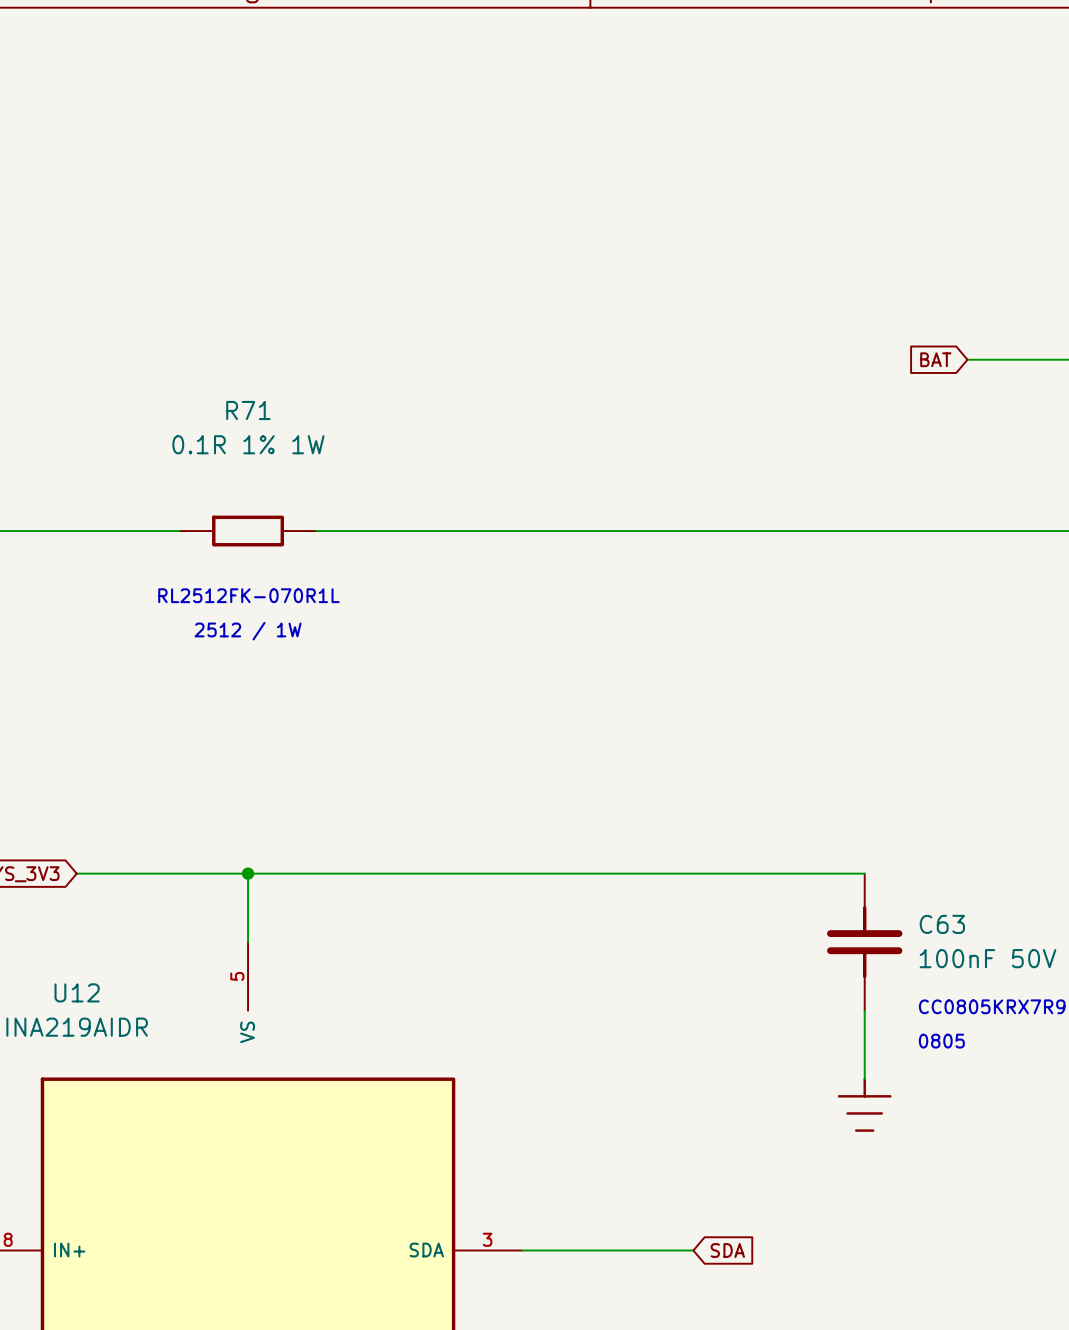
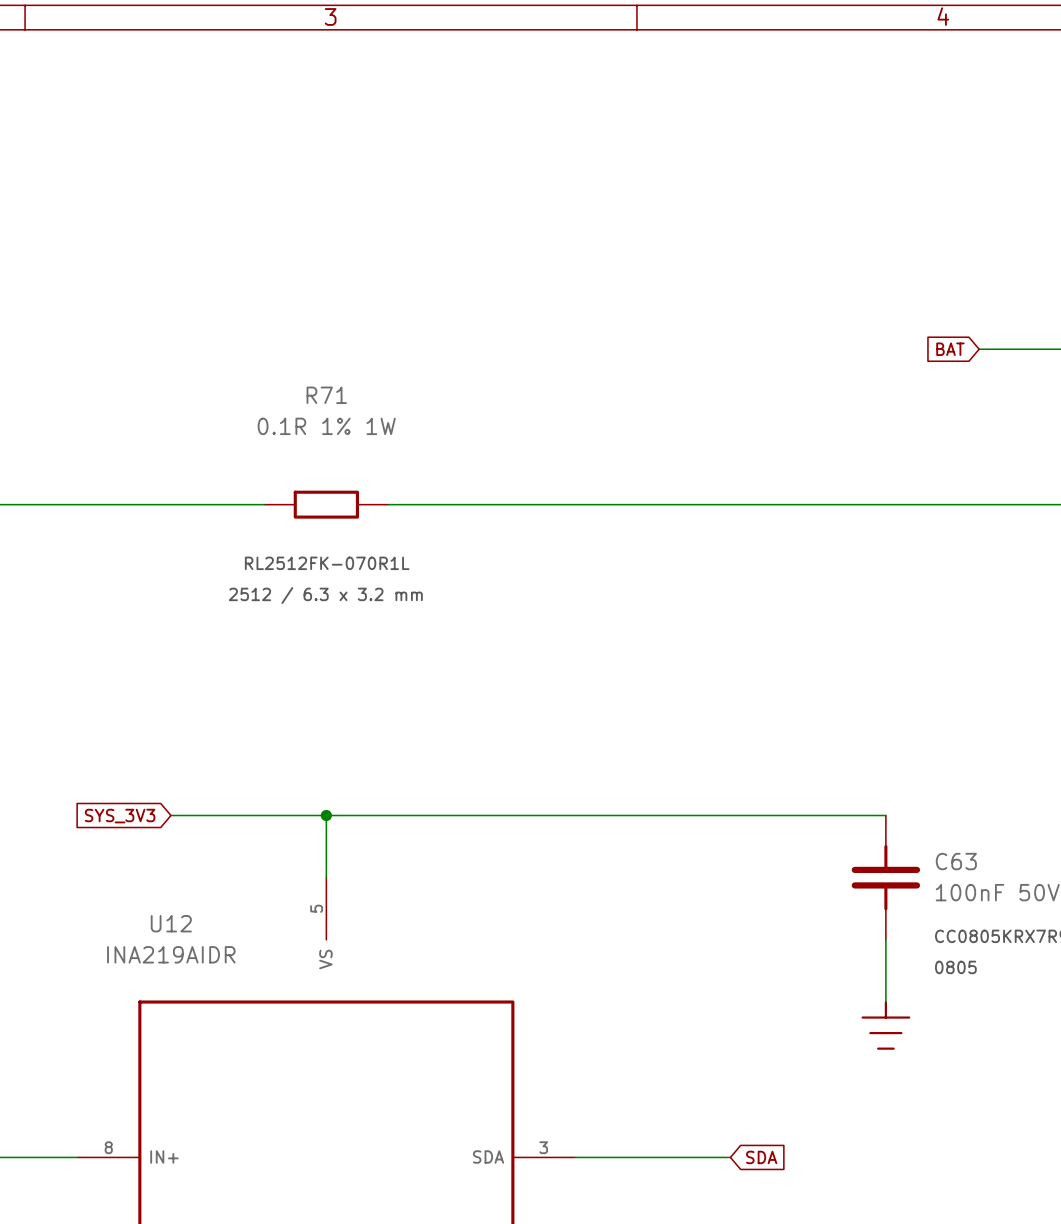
text: 2512 / 1W (248, 631) -> 2512 / 6.3 x 3.2 mm (325, 595)

